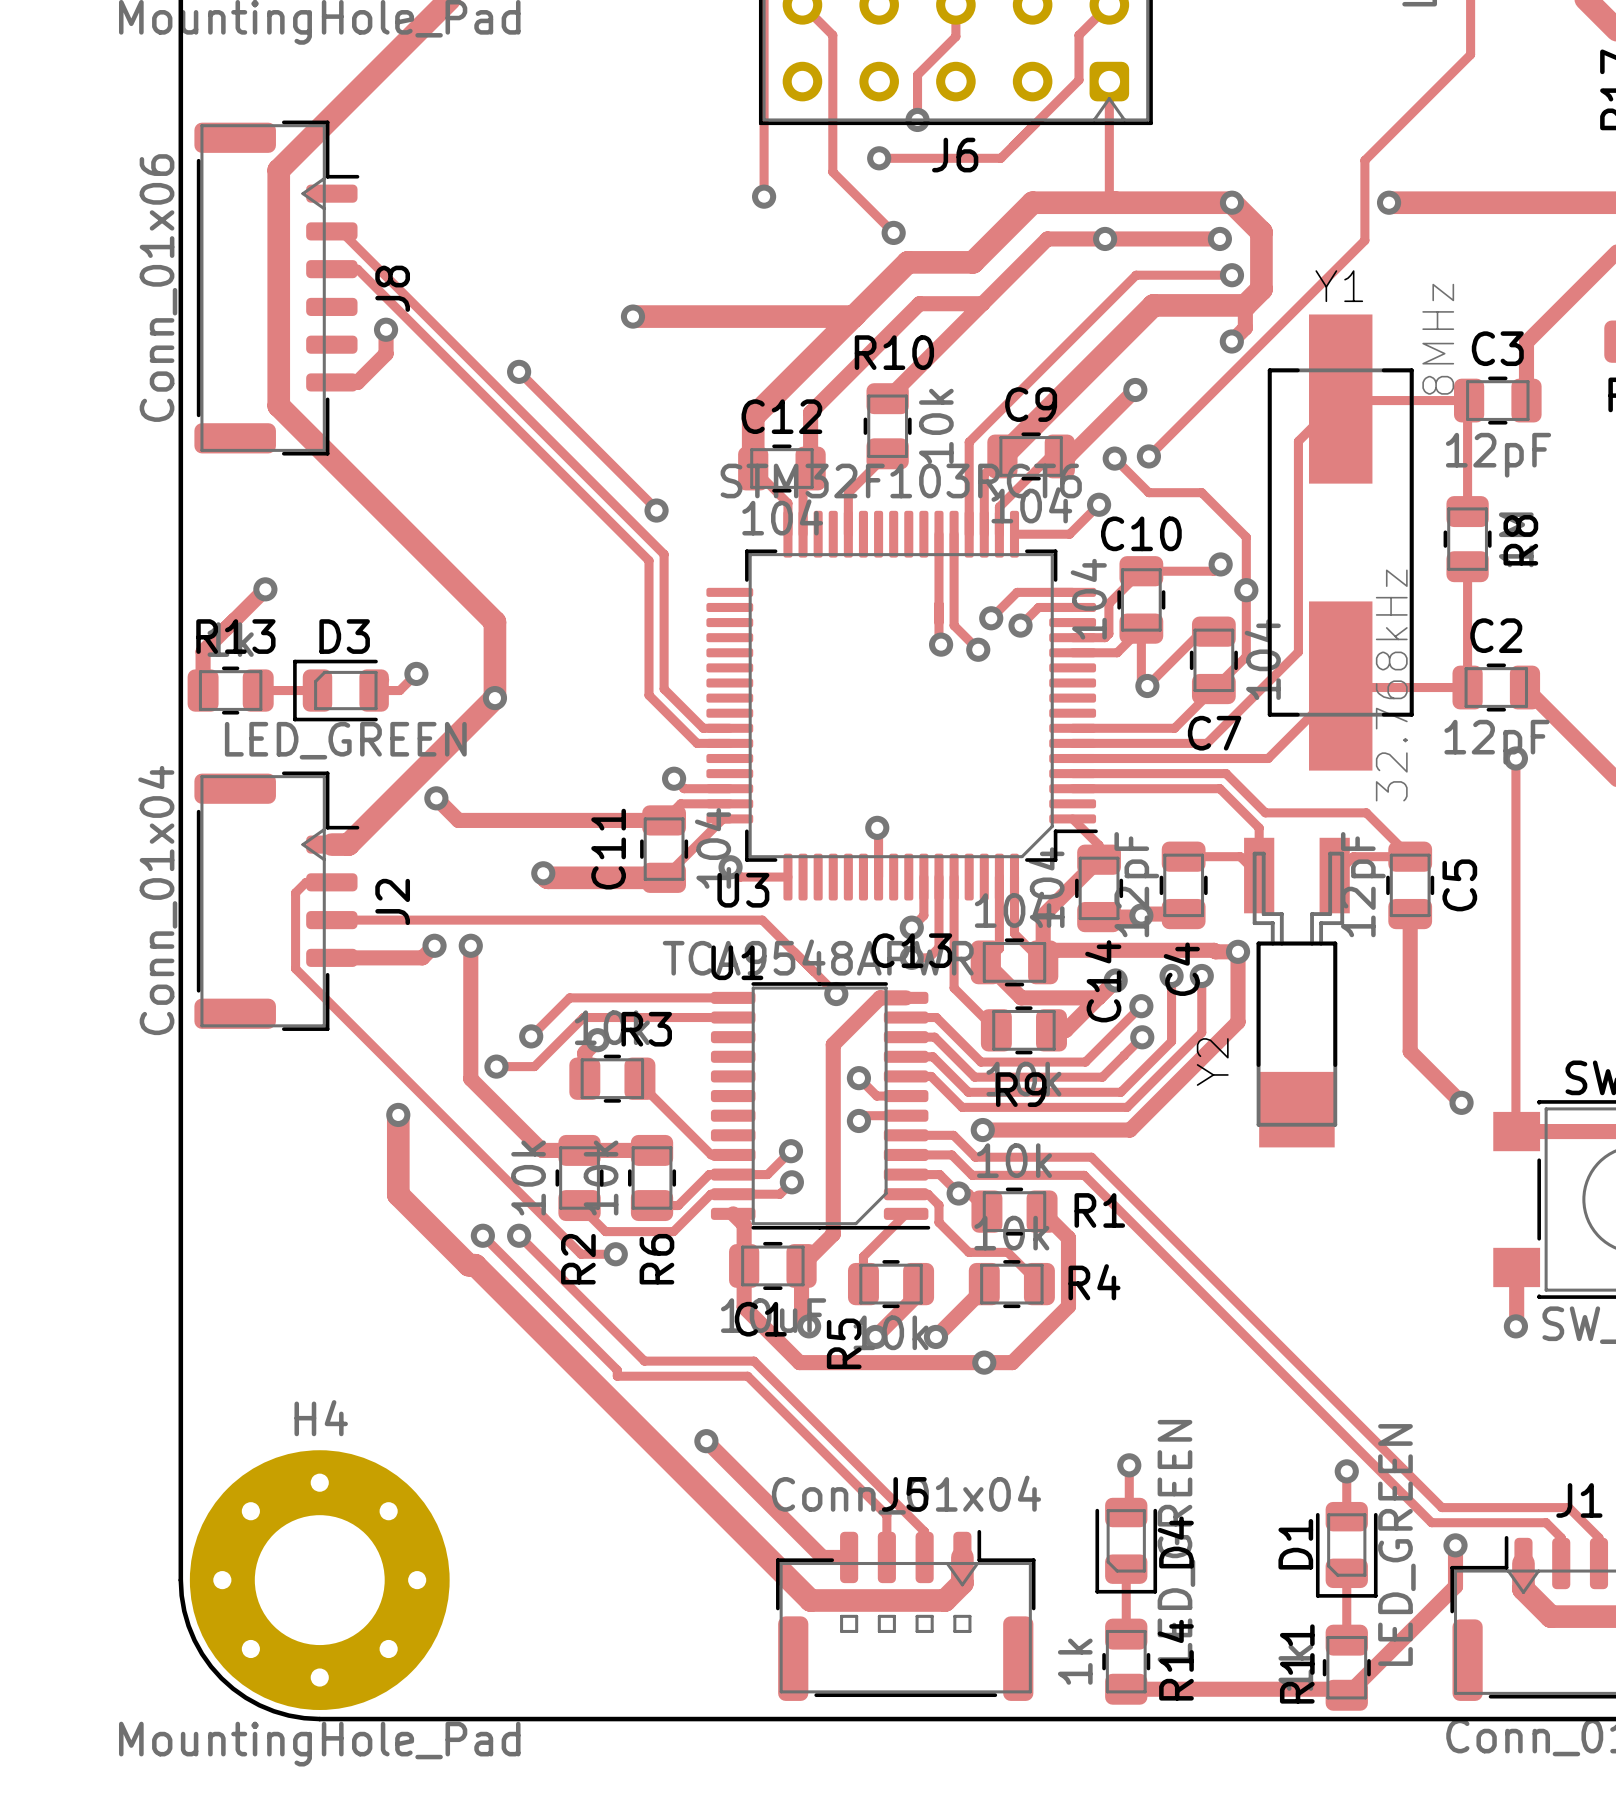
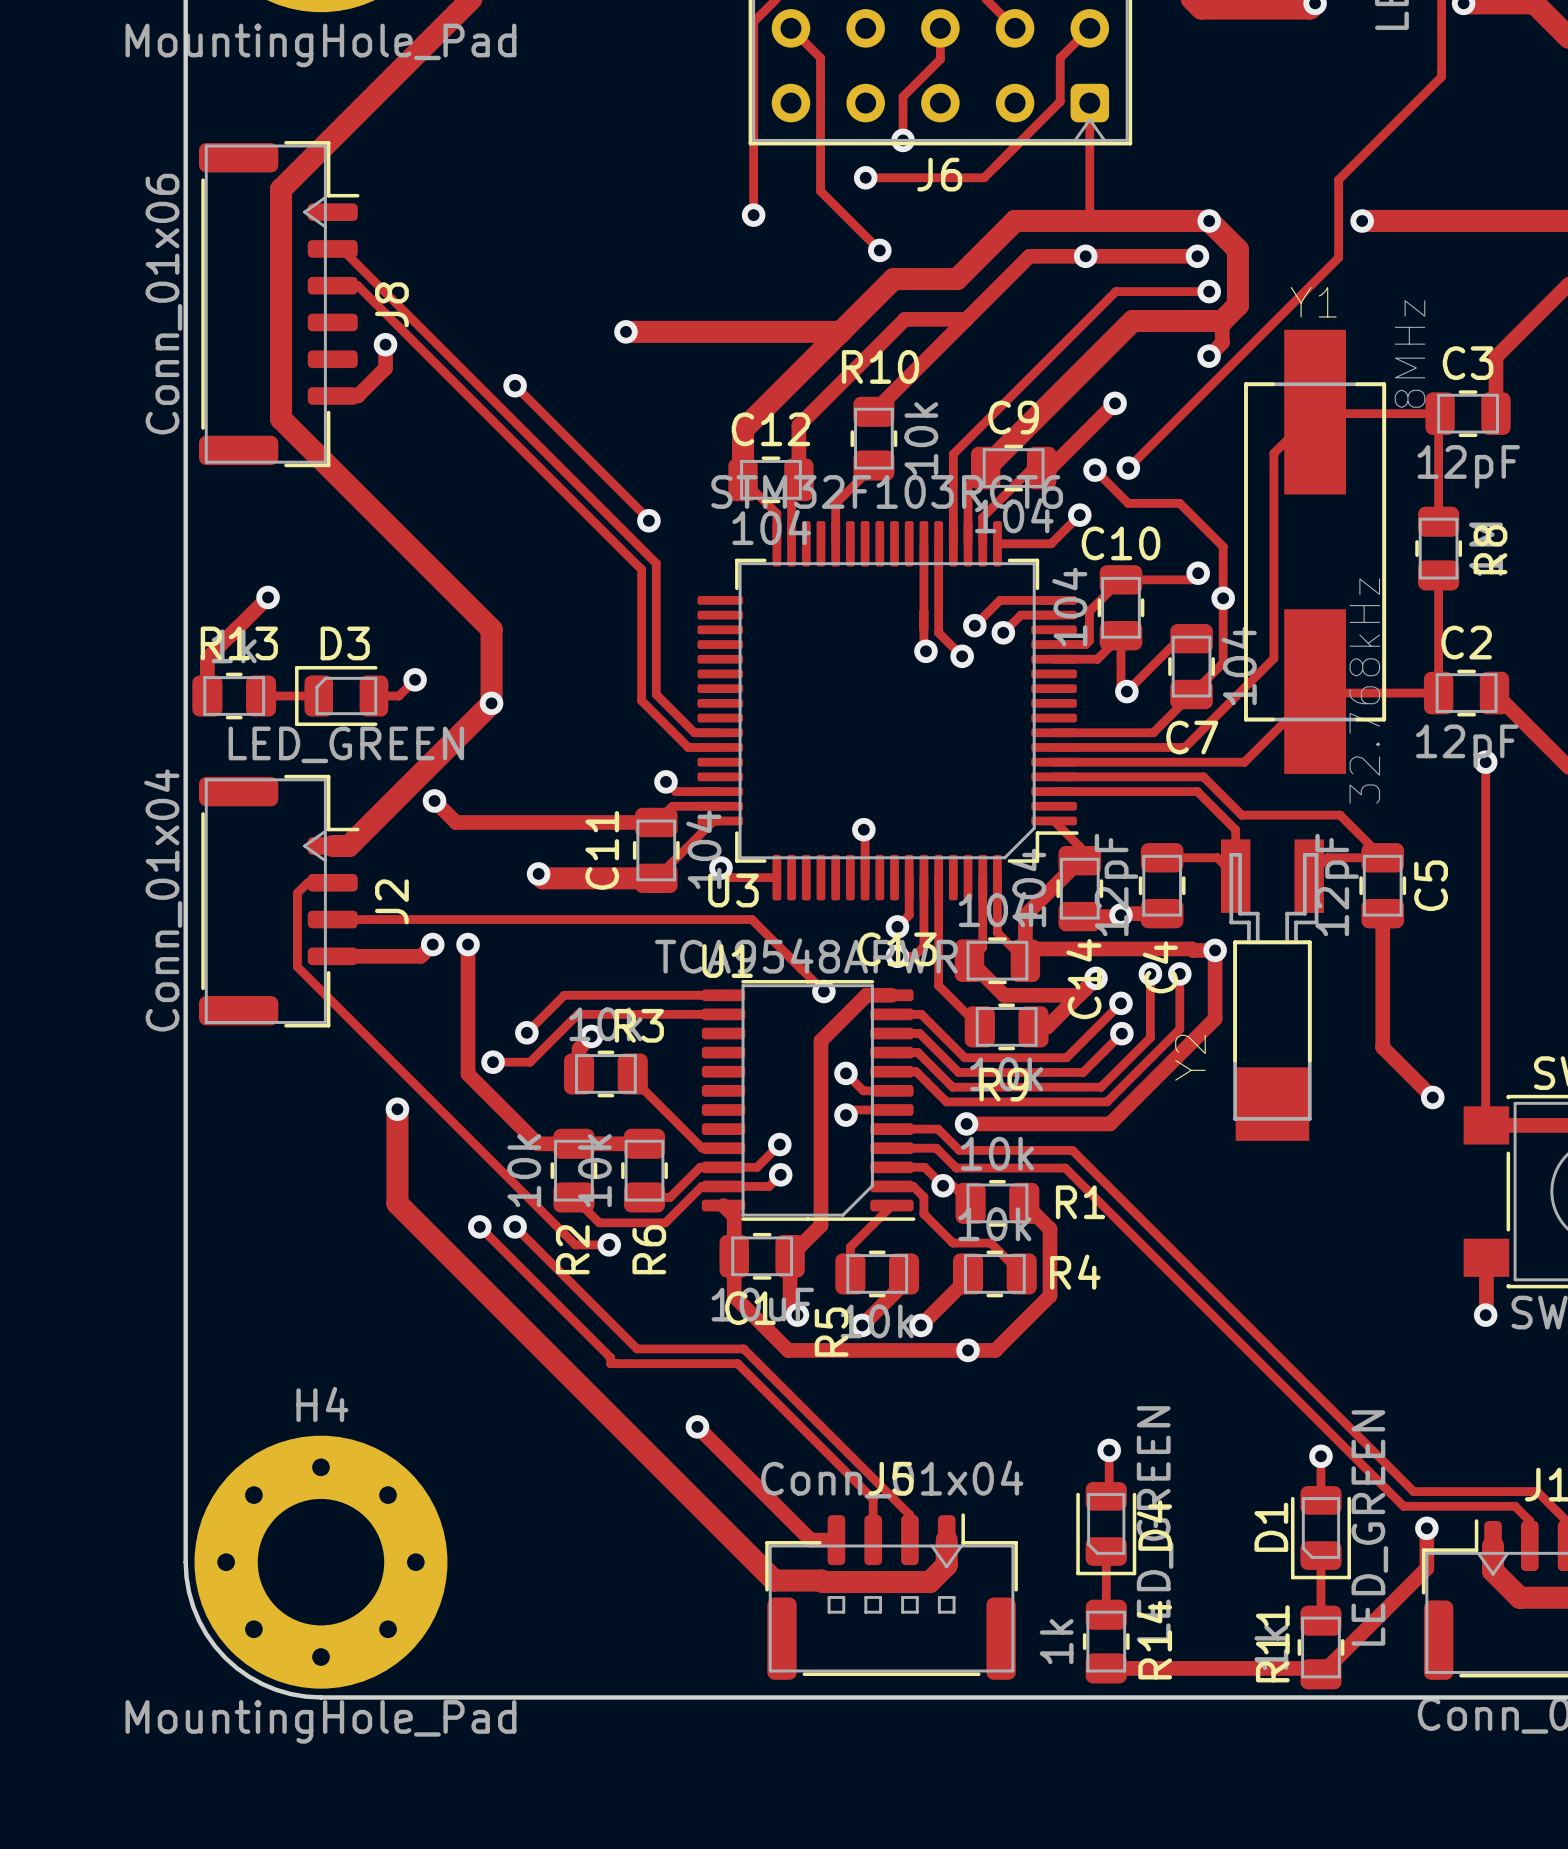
track: (398, 1194) (468, 1265) (475, 1265) (810, 1600) (835, 1600) -> (397, 1186) (397, 1203) (774, 1580) (823, 1582)

